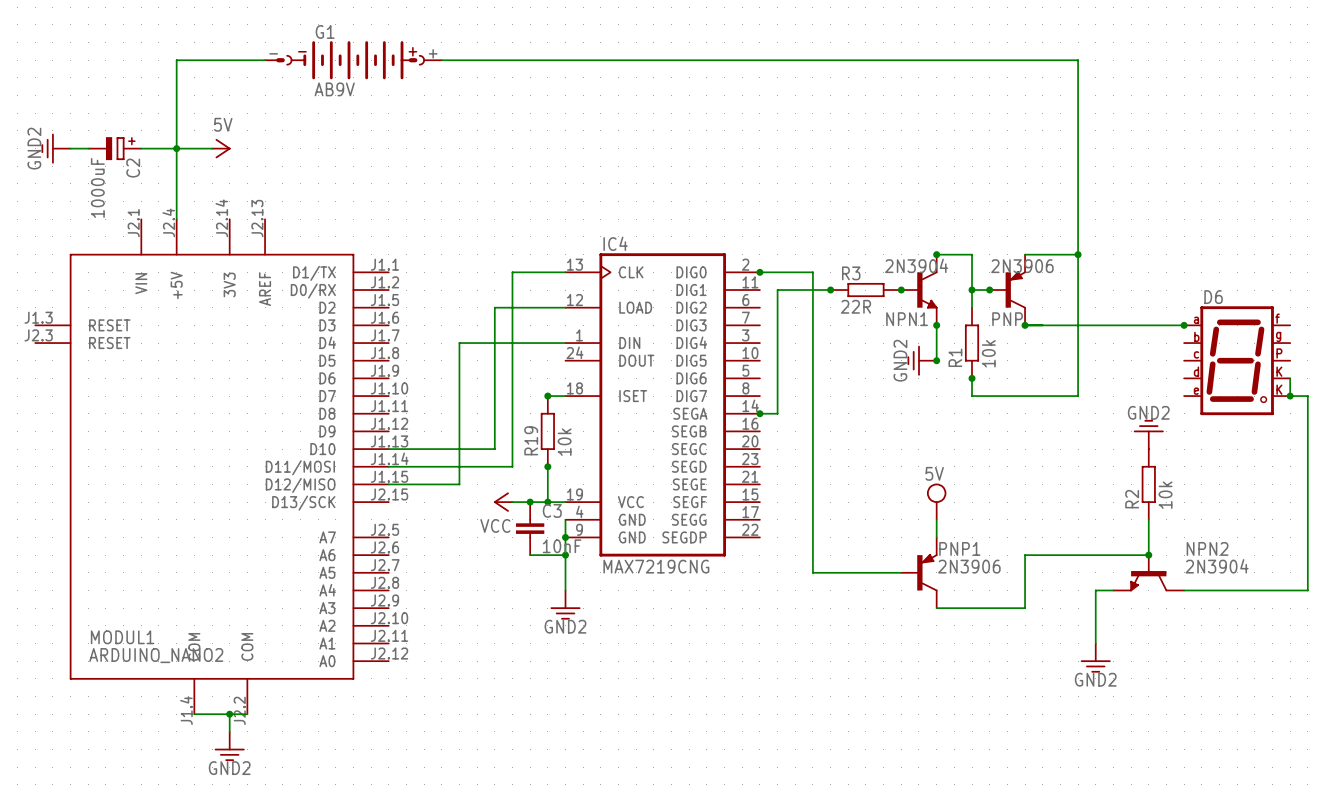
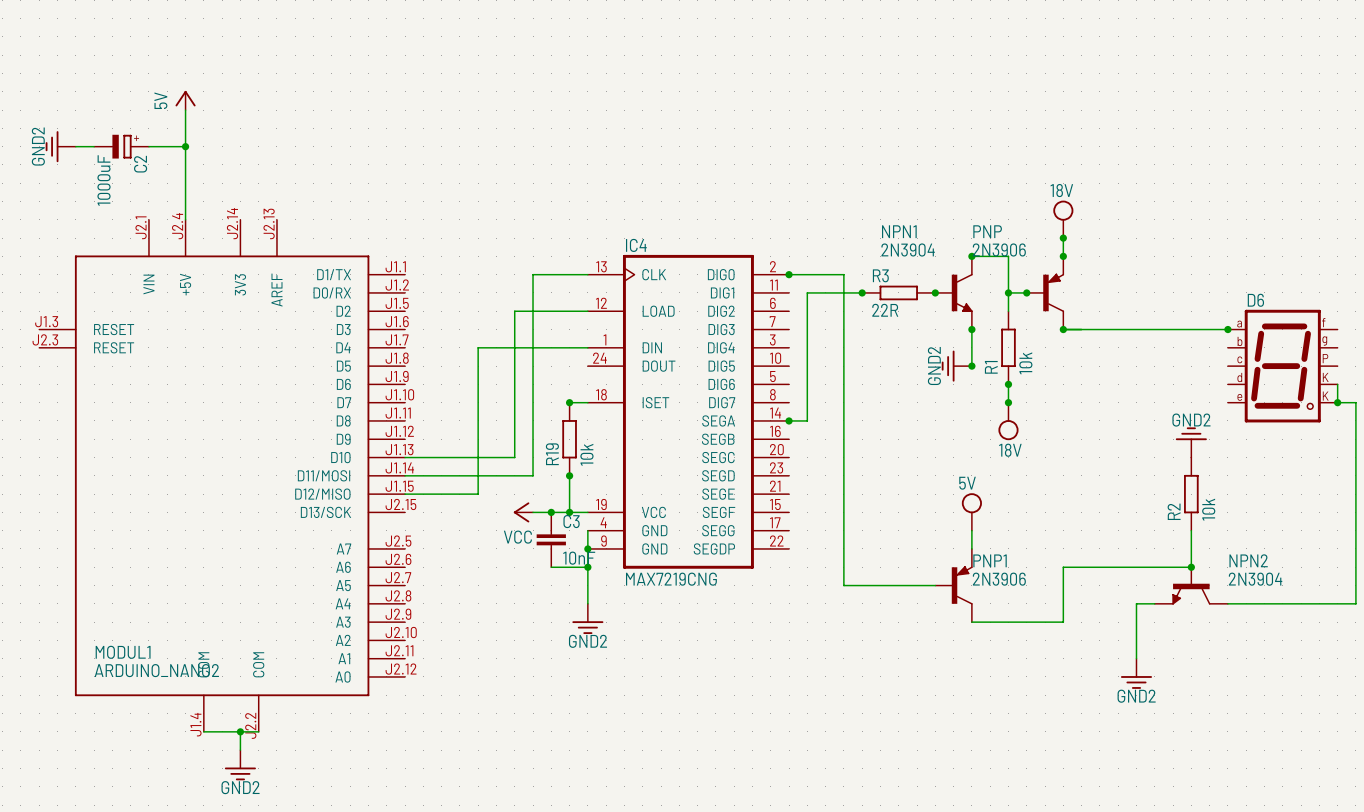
wire: (265, 60) (176, 60) (176, 113) -> none
G1: AB9V (353, 60) -> none
wire: (441, 60) (1078, 60) (1078, 396) (972, 396) -> none
wire: (176, 148) (212, 148) -> none
power symbol position: 5V (221, 148) -> 5V (185, 100)
power symbol rotation: 0° (223, 148) -> 90° counterclockwise (185, 98)
power symbol: none -> 18V (1063, 219)
junction: none -> (1063, 238)
wire: (1025, 254) (1078, 254) -> (1063, 256) (1063, 238)
junction: none -> (1063, 256)
junction: (1078, 254) -> none
NPN1 value position: 2N3904 (916, 265) -> 2N3904 (908, 249)
PNP value position: 2N3906 (1022, 266) -> 2N3906 (999, 249)
NPN1 name position: NPN1 (907, 319) -> NPN1 (899, 231)
PNP name position: PNP (1007, 319) -> PNP (987, 231)
junction: none -> (1008, 402)
power symbol: none -> 18V (1008, 421)

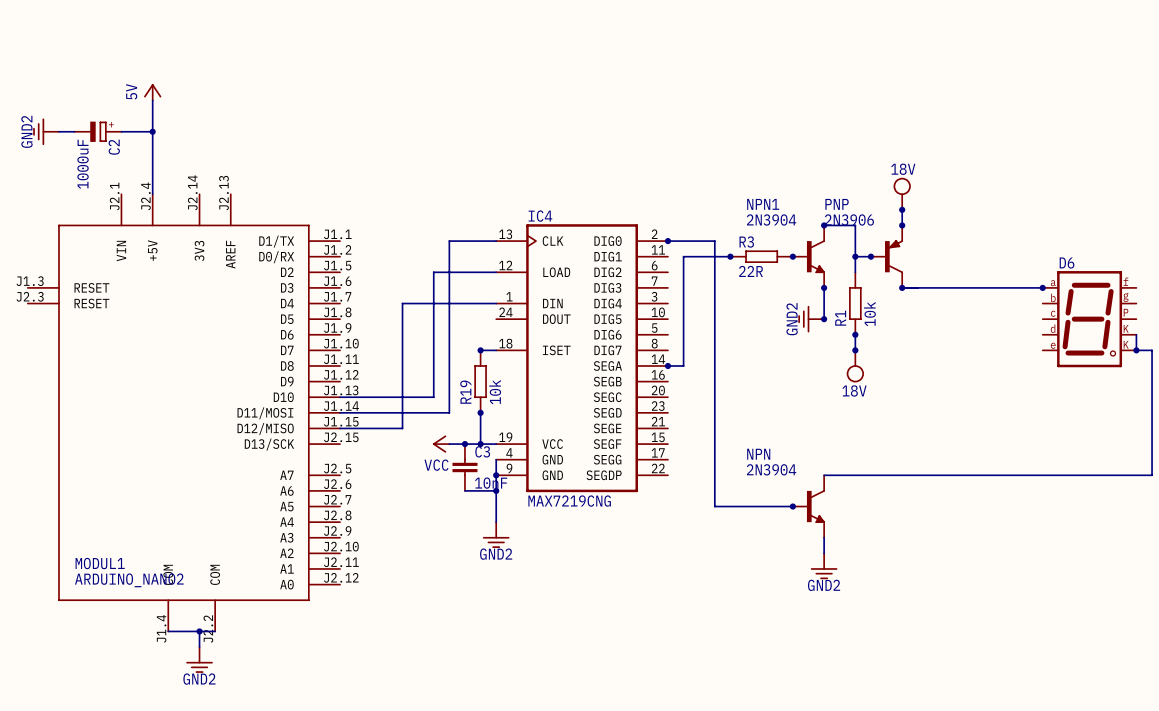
power symbol: GND2 (1191, 442) -> none
R2: 10k (1191, 494) -> none
power symbol: 5V (971, 511) -> none
wire: (971, 530) (971, 548) -> none
wire: (1191, 530) (1191, 567) (1063, 567) (1063, 622) (971, 622) -> (824, 553) (824, 537)
wire: (1355, 548) (1355, 603) (1227, 603) -> (1152, 475) (824, 475)
junction: (1191, 567) -> none
junction: none -> (792, 506)
PNP1: 2N3906 (953, 585) -> none
NPN: none -> 2N3904 (808, 506)
NPN2: 2N3904 (1191, 585) -> none
wire: (1154, 603) (1136, 603) (1136, 658) -> none
power symbol: none -> GND2 (824, 566)
power symbol: GND2 (1136, 673) -> none

